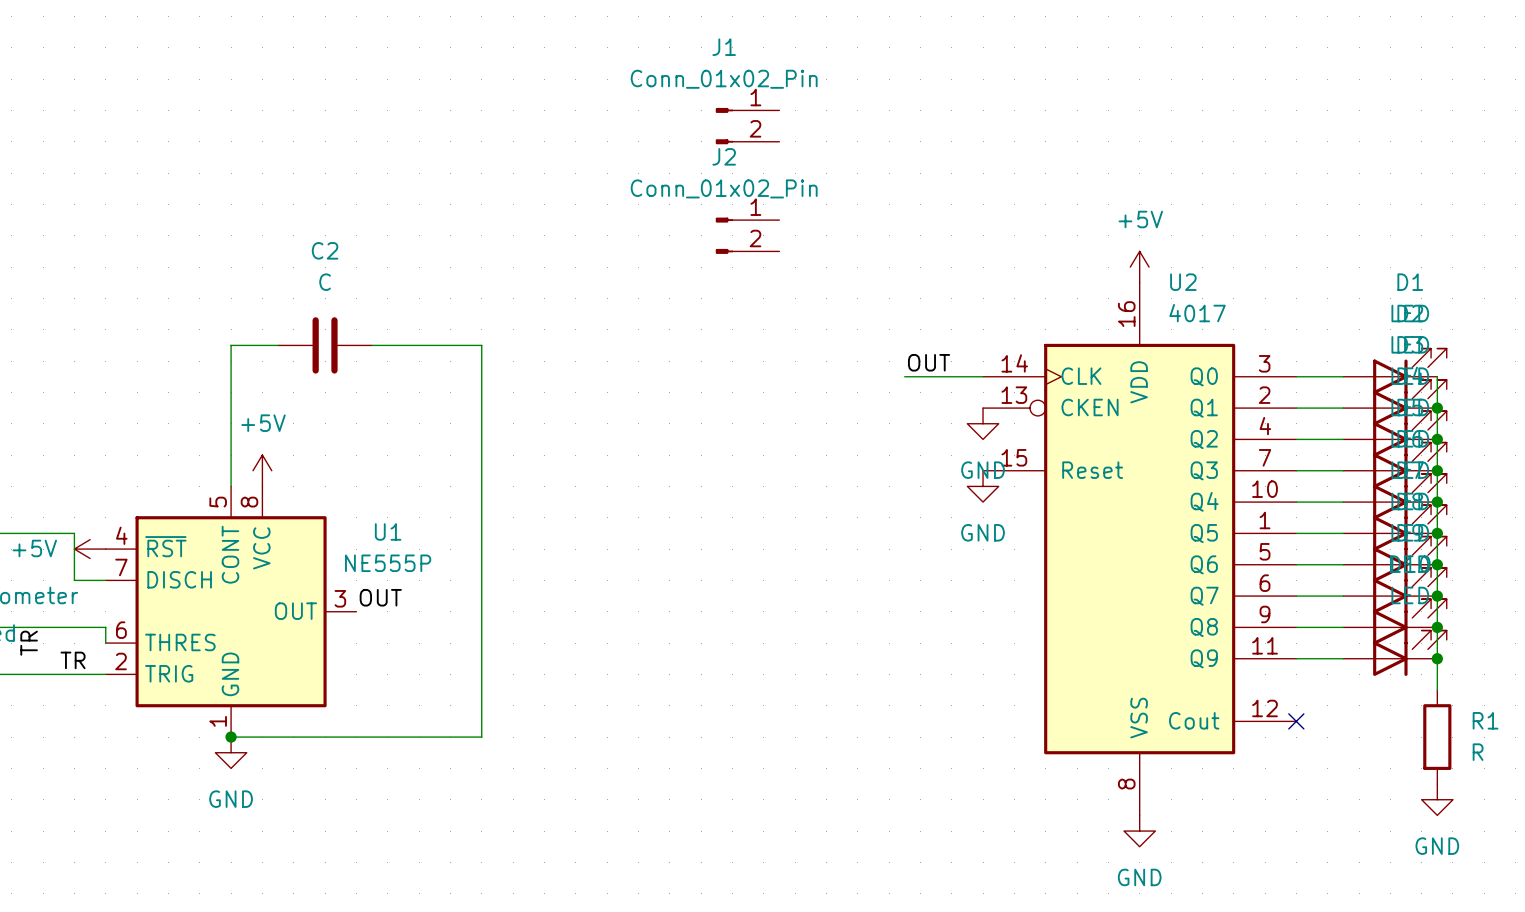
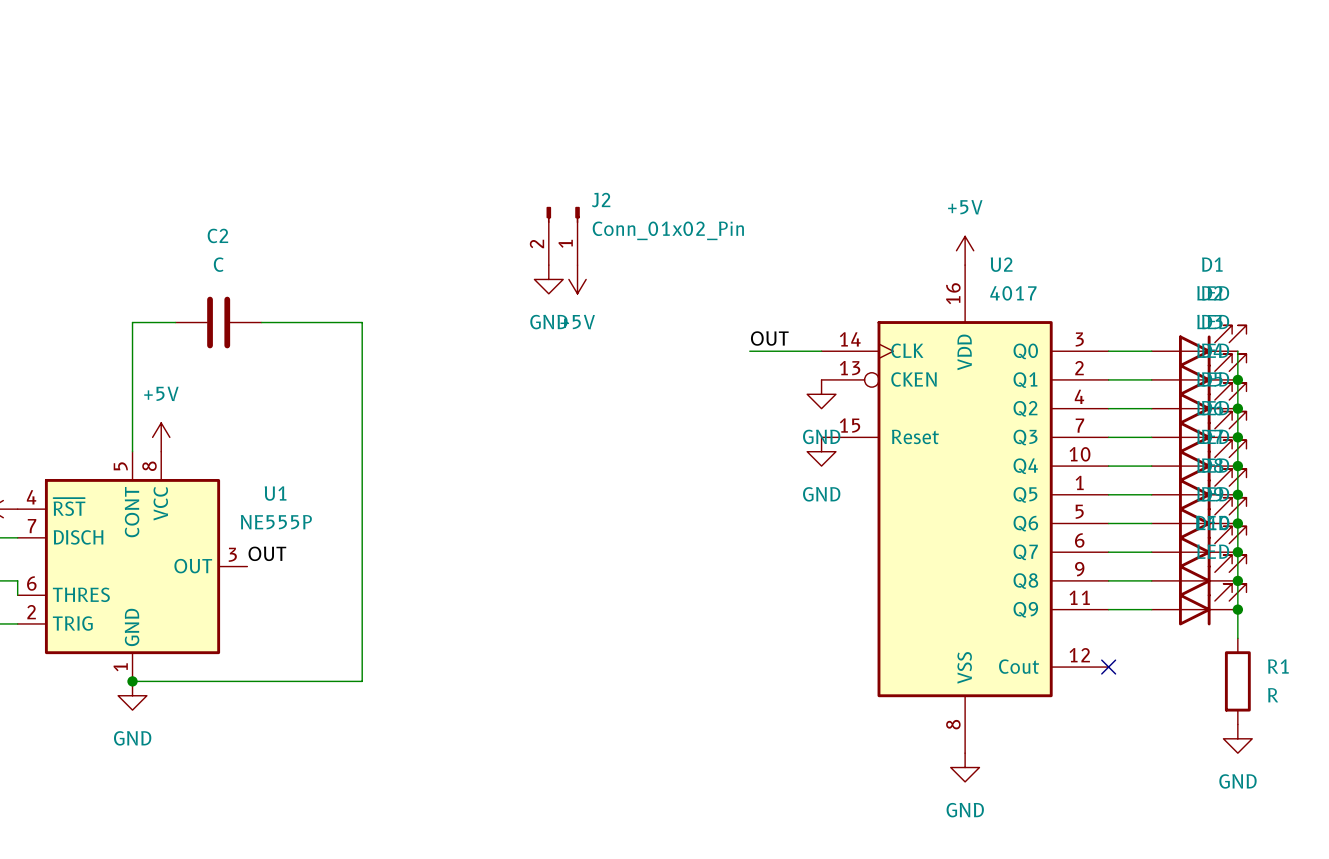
J1: Conn_01x02_Pin (747, 126) -> none
J2 name position: J2 (724, 156) -> J2 (601, 200)
J2 value position: Conn_01x02_Pin (724, 188) -> Conn_01x02_Pin (668, 230)
J2 rotation: 0° (724, 235) -> 90° clockwise (563, 214)
J2 position: (747, 235) -> (563, 235)
power symbol: none -> GND (548, 279)
power symbol: none -> +5V (577, 279)

